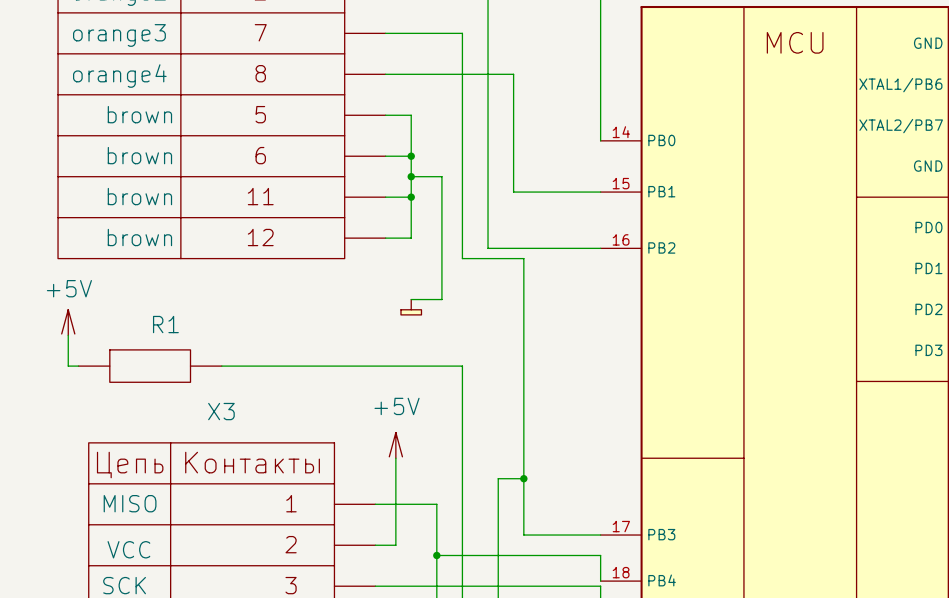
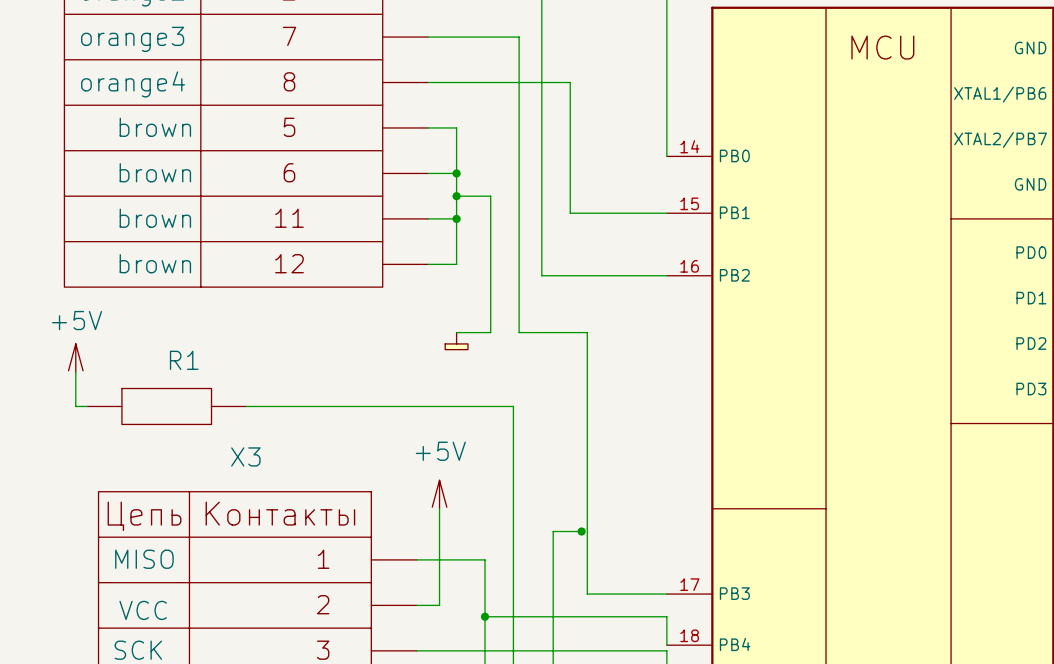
wire: (462, 33) (462, 258) (523, 258) (523, 535) (528, 535) -> (513, 37) (519, 37) (519, 332) (587, 332) (587, 594)

